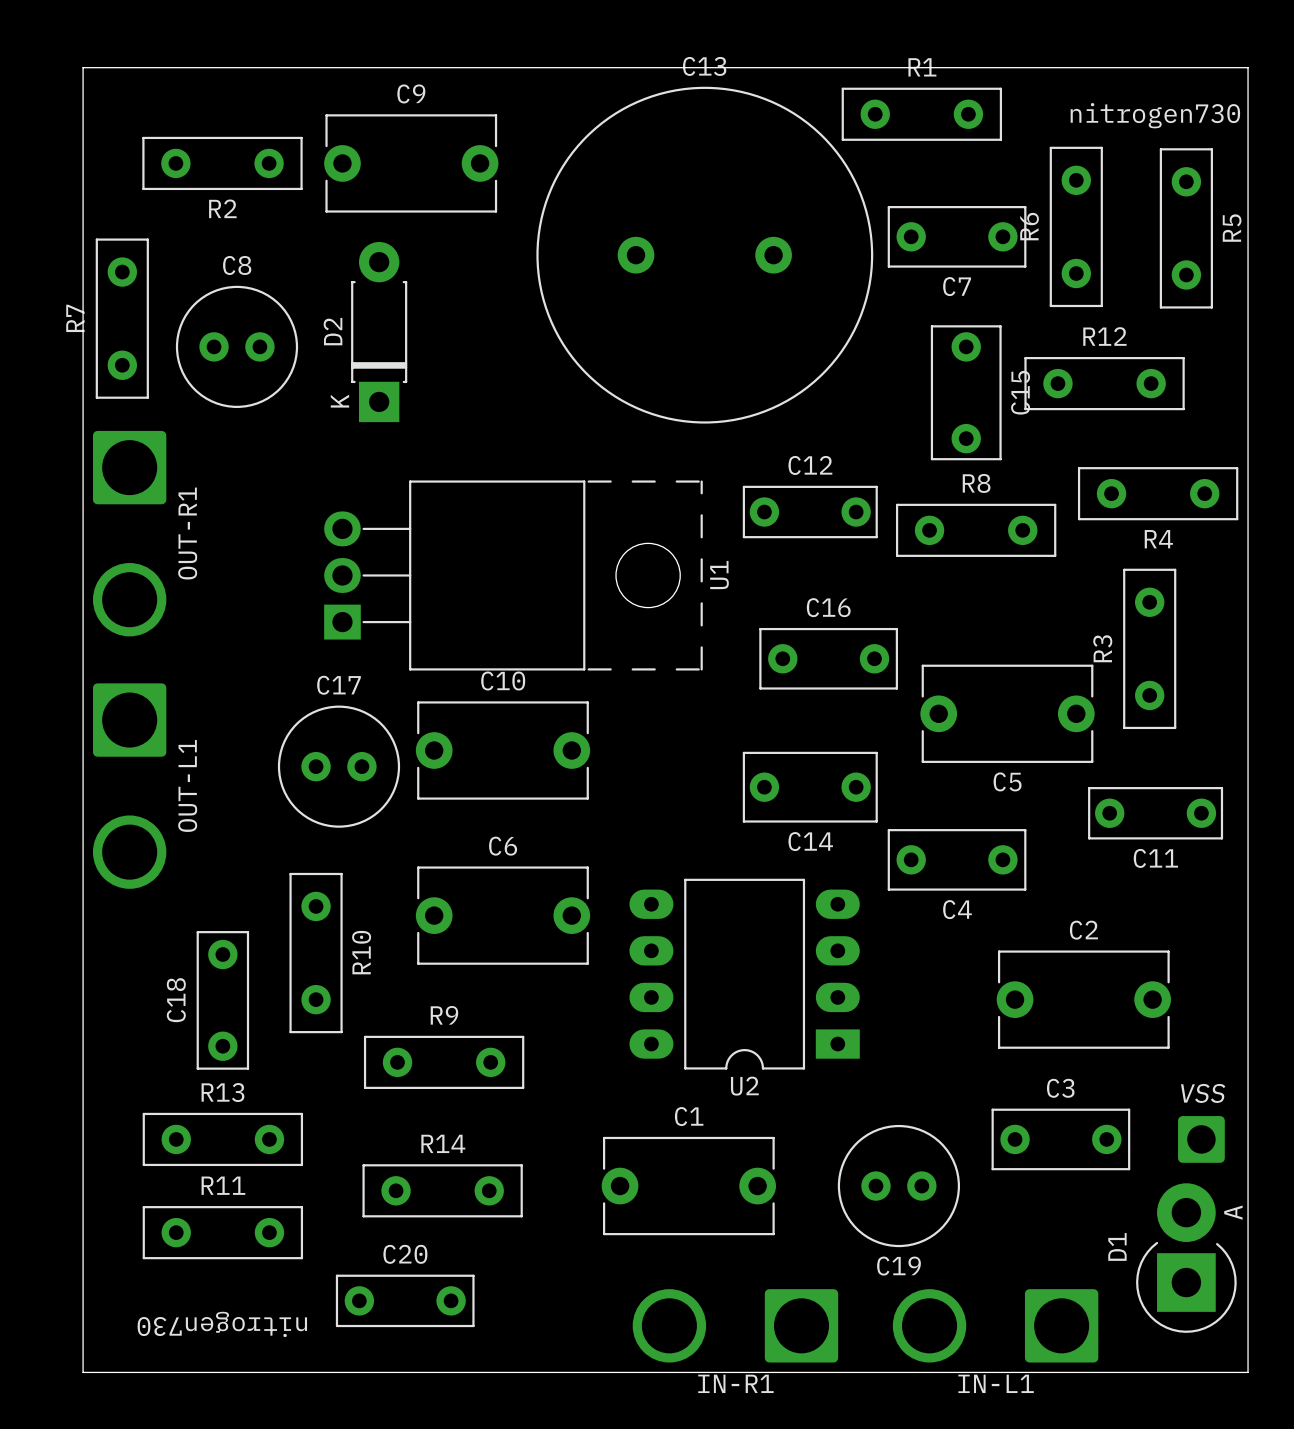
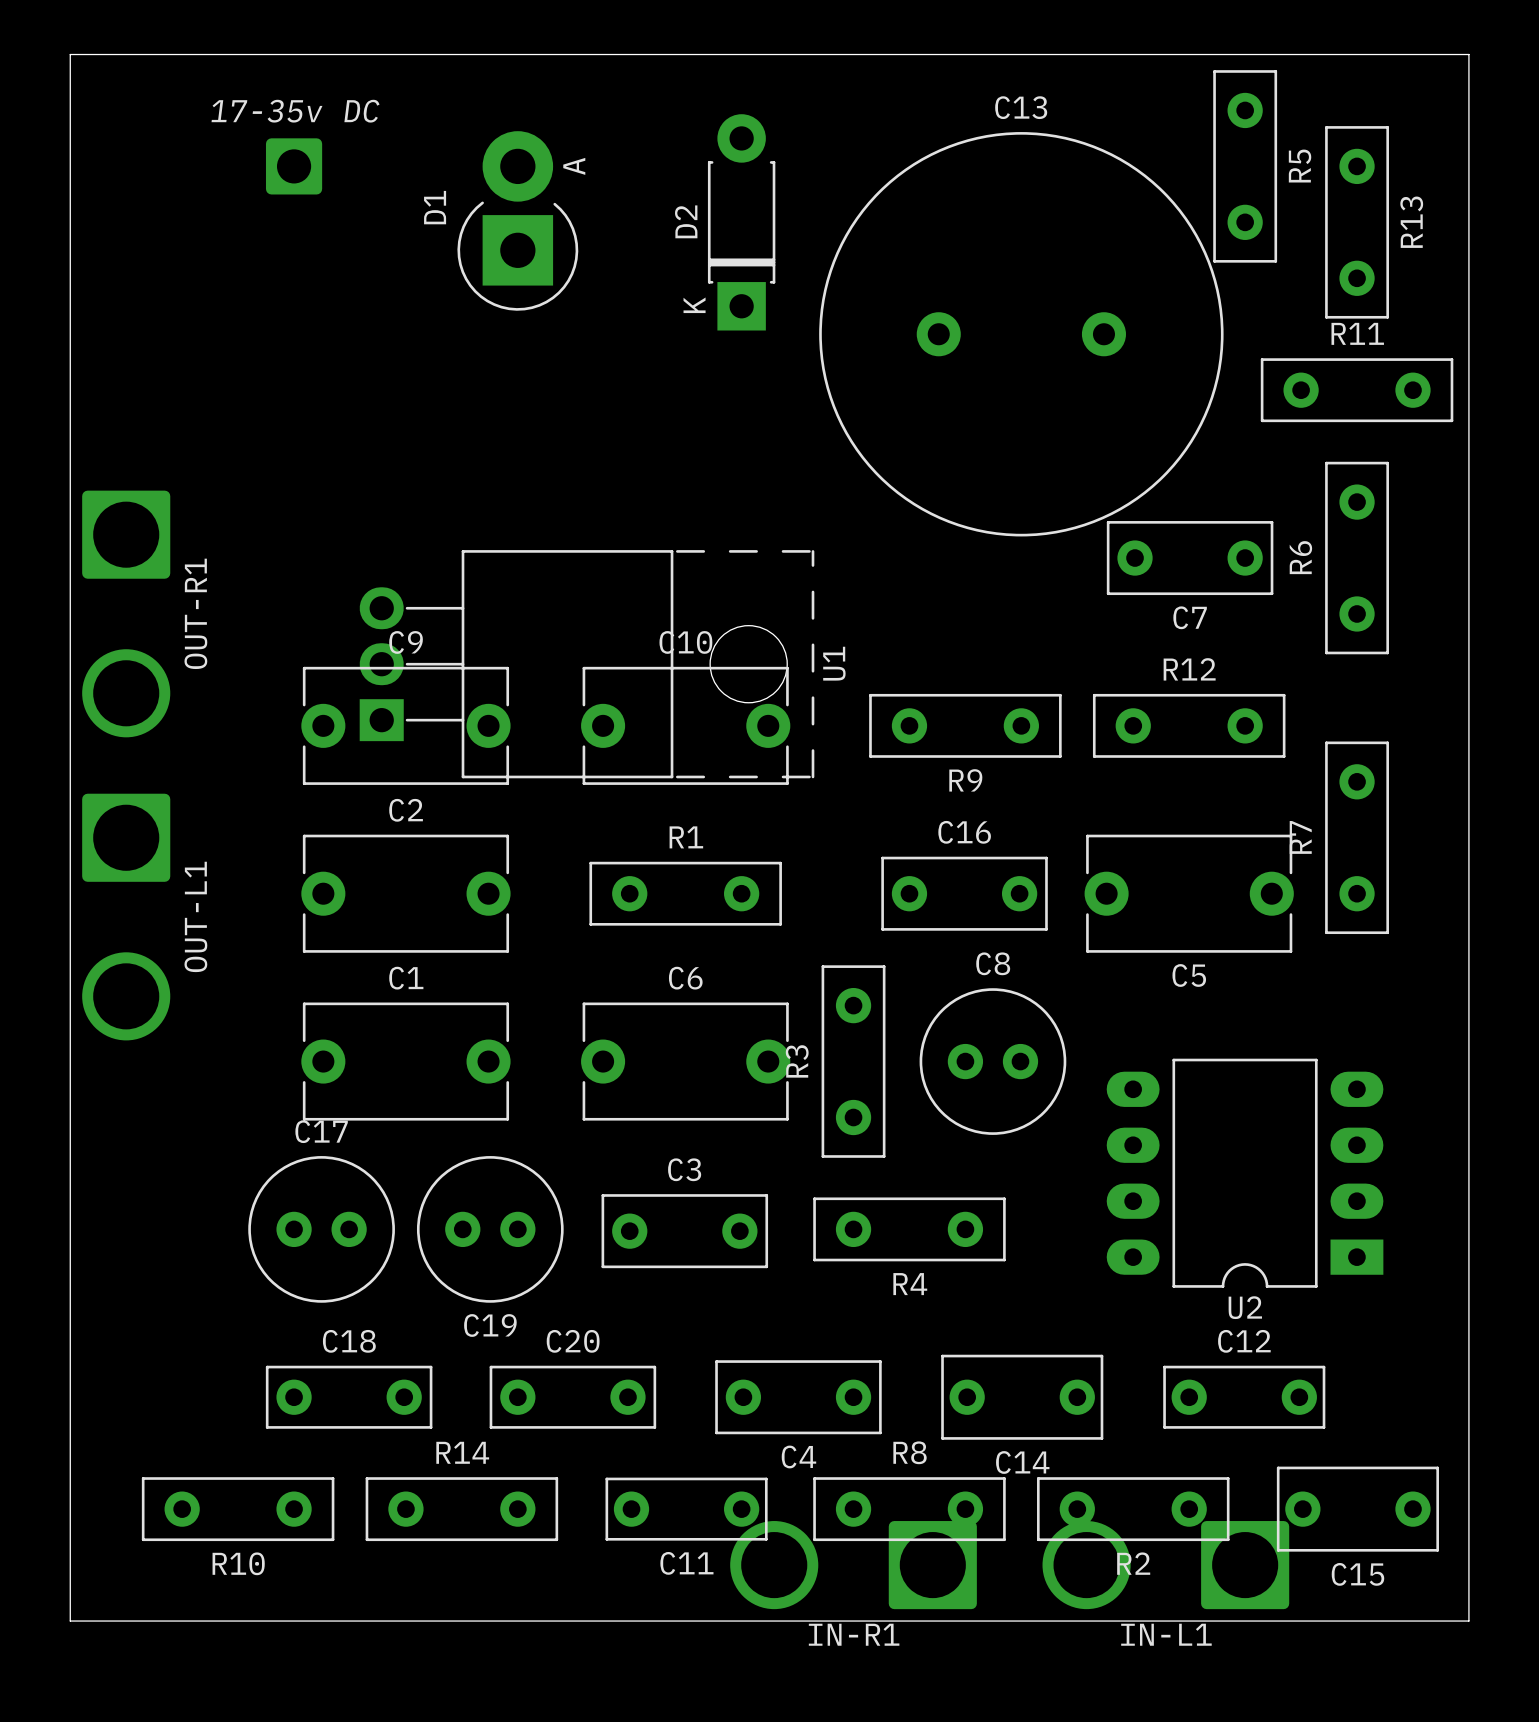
R1 position: (921, 114) -> (685, 893)
text: nitrogen730 (1155, 115) -> none
17-35v DC: none -> (294, 166)
R2 position: (222, 163) -> (1133, 1509)
C9 position: (411, 163) -> (405, 725)
R6 position: (1076, 226) -> (1357, 558)
R5 position: (1186, 228) -> (1245, 166)
C7 position: (957, 236) -> (1190, 558)
C13 position: (704, 255) -> (1021, 334)
R7 position: (122, 318) -> (1357, 837)
D2 position: (379, 332) -> (741, 222)
C8 position: (236, 346) -> (992, 1061)
R12 position: (1104, 383) -> (1189, 725)
C15 rotation: 0° (966, 392) -> 90° clockwise (1357, 1509)
C15 position: (966, 392) -> (1357, 1509)
R4 position: (1158, 493) -> (909, 1229)
C12 position: (810, 512) -> (1244, 1397)
R8 position: (976, 530) -> (909, 1509)
R3 position: (1149, 648) -> (853, 1061)
C16 position: (828, 658) -> (964, 893)
C5 position: (1007, 713) -> (1189, 893)
C10 position: (503, 750) -> (685, 725)
C17 position: (338, 766) -> (321, 1229)
C14 position: (810, 787) -> (1022, 1397)
C11 position: (1155, 813) -> (686, 1509)
C4 position: (957, 859) -> (798, 1397)
C6 position: (503, 915) -> (685, 1061)
R10 rotation: 0° (316, 953) -> 90° clockwise (238, 1509)
R10 position: (316, 953) -> (238, 1509)
U2 position: (744, 974) -> (1245, 1173)
C2 position: (1083, 999) -> (405, 893)
C18 rotation: 0° (222, 1000) -> 90° clockwise (349, 1397)
C18 position: (222, 1000) -> (349, 1397)
R9 name position: R9 (444, 1015) -> R9 (965, 780)
R9 position: (444, 1062) -> (965, 725)
R13 rotation: 0° (222, 1139) -> 90° clockwise (1357, 222)
R13 position: (222, 1139) -> (1357, 222)
C3 position: (1060, 1139) -> (684, 1231)
VSS: (1201, 1139) -> none
C1 position: (688, 1186) -> (405, 1061)
C19 position: (898, 1186) -> (490, 1229)
R14 position: (442, 1190) -> (461, 1509)
R11 position: (222, 1232) -> (1357, 390)
D1 position: (1186, 1258) -> (517, 220)
C20 position: (405, 1300) -> (572, 1397)
text: nitrogen730 (222, 1324) -> none

